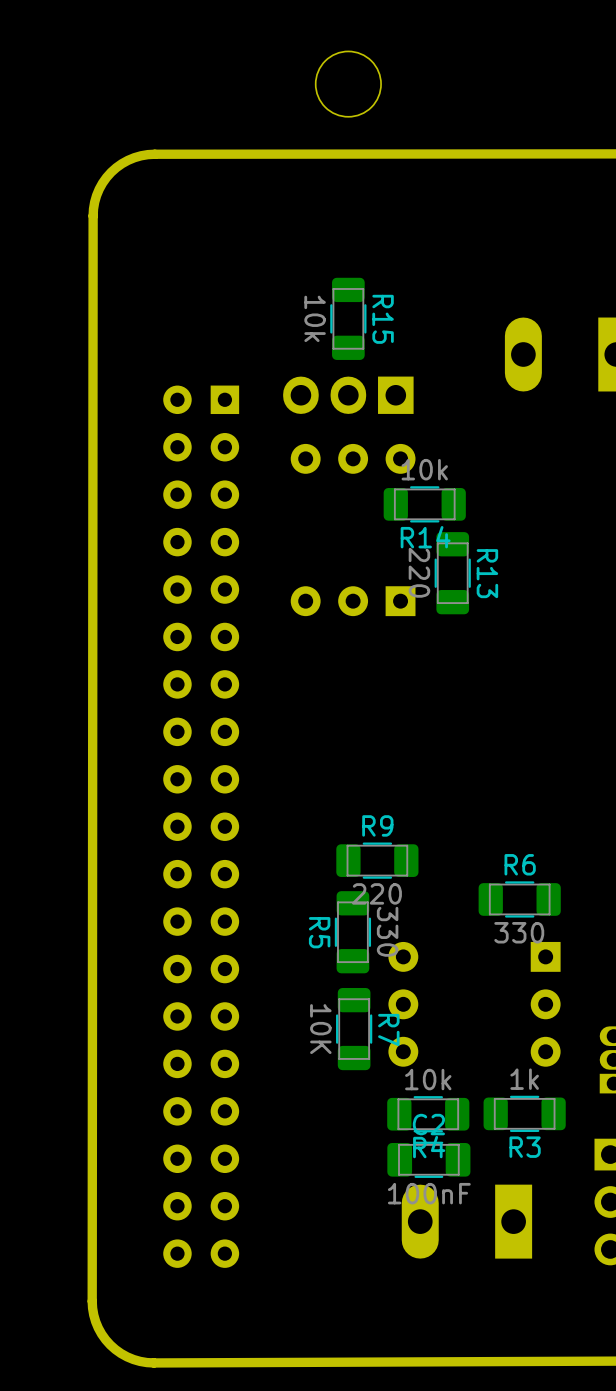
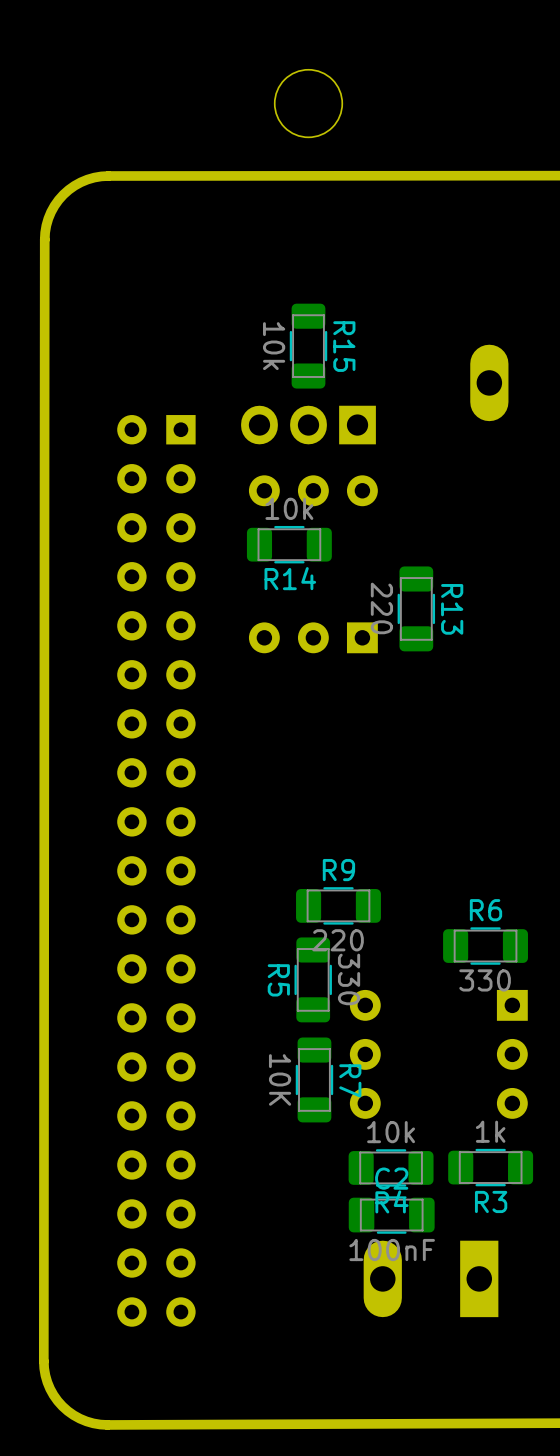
R14 position: (424, 504) -> (289, 544)

